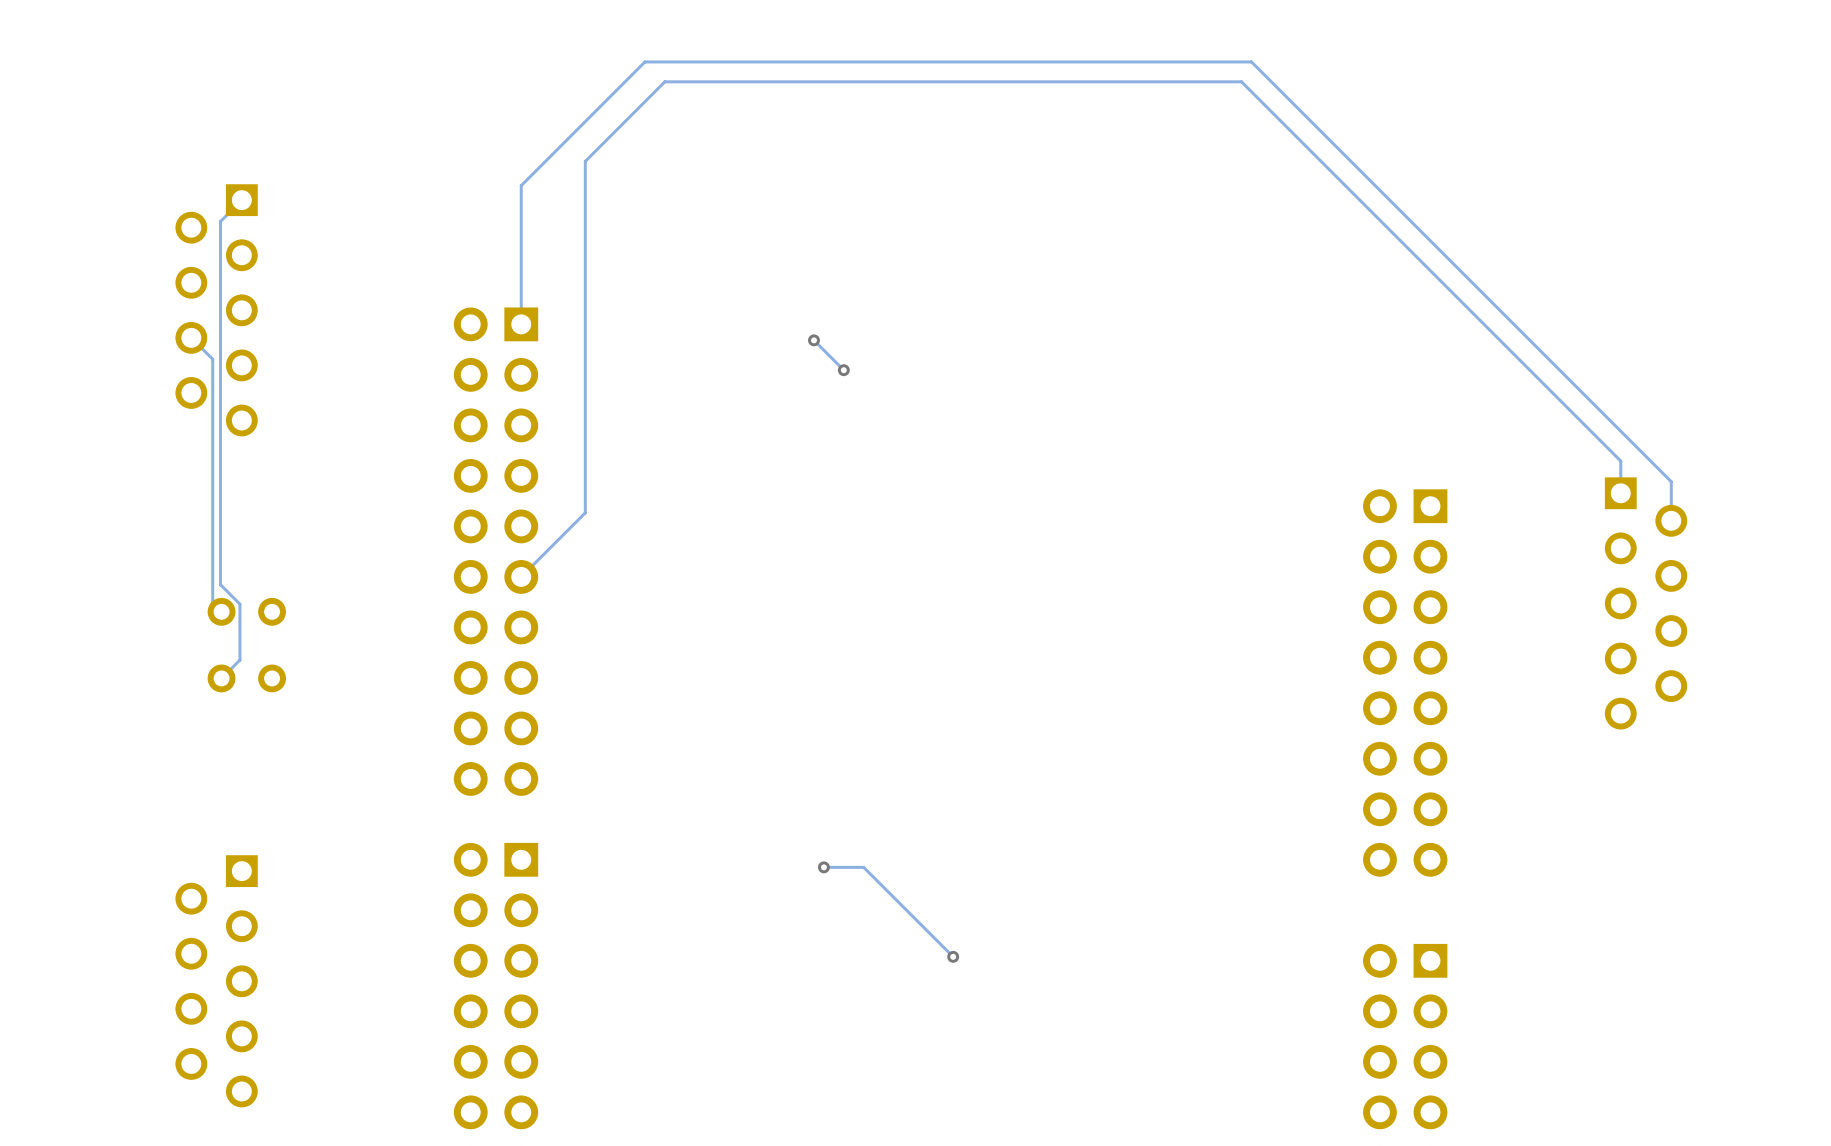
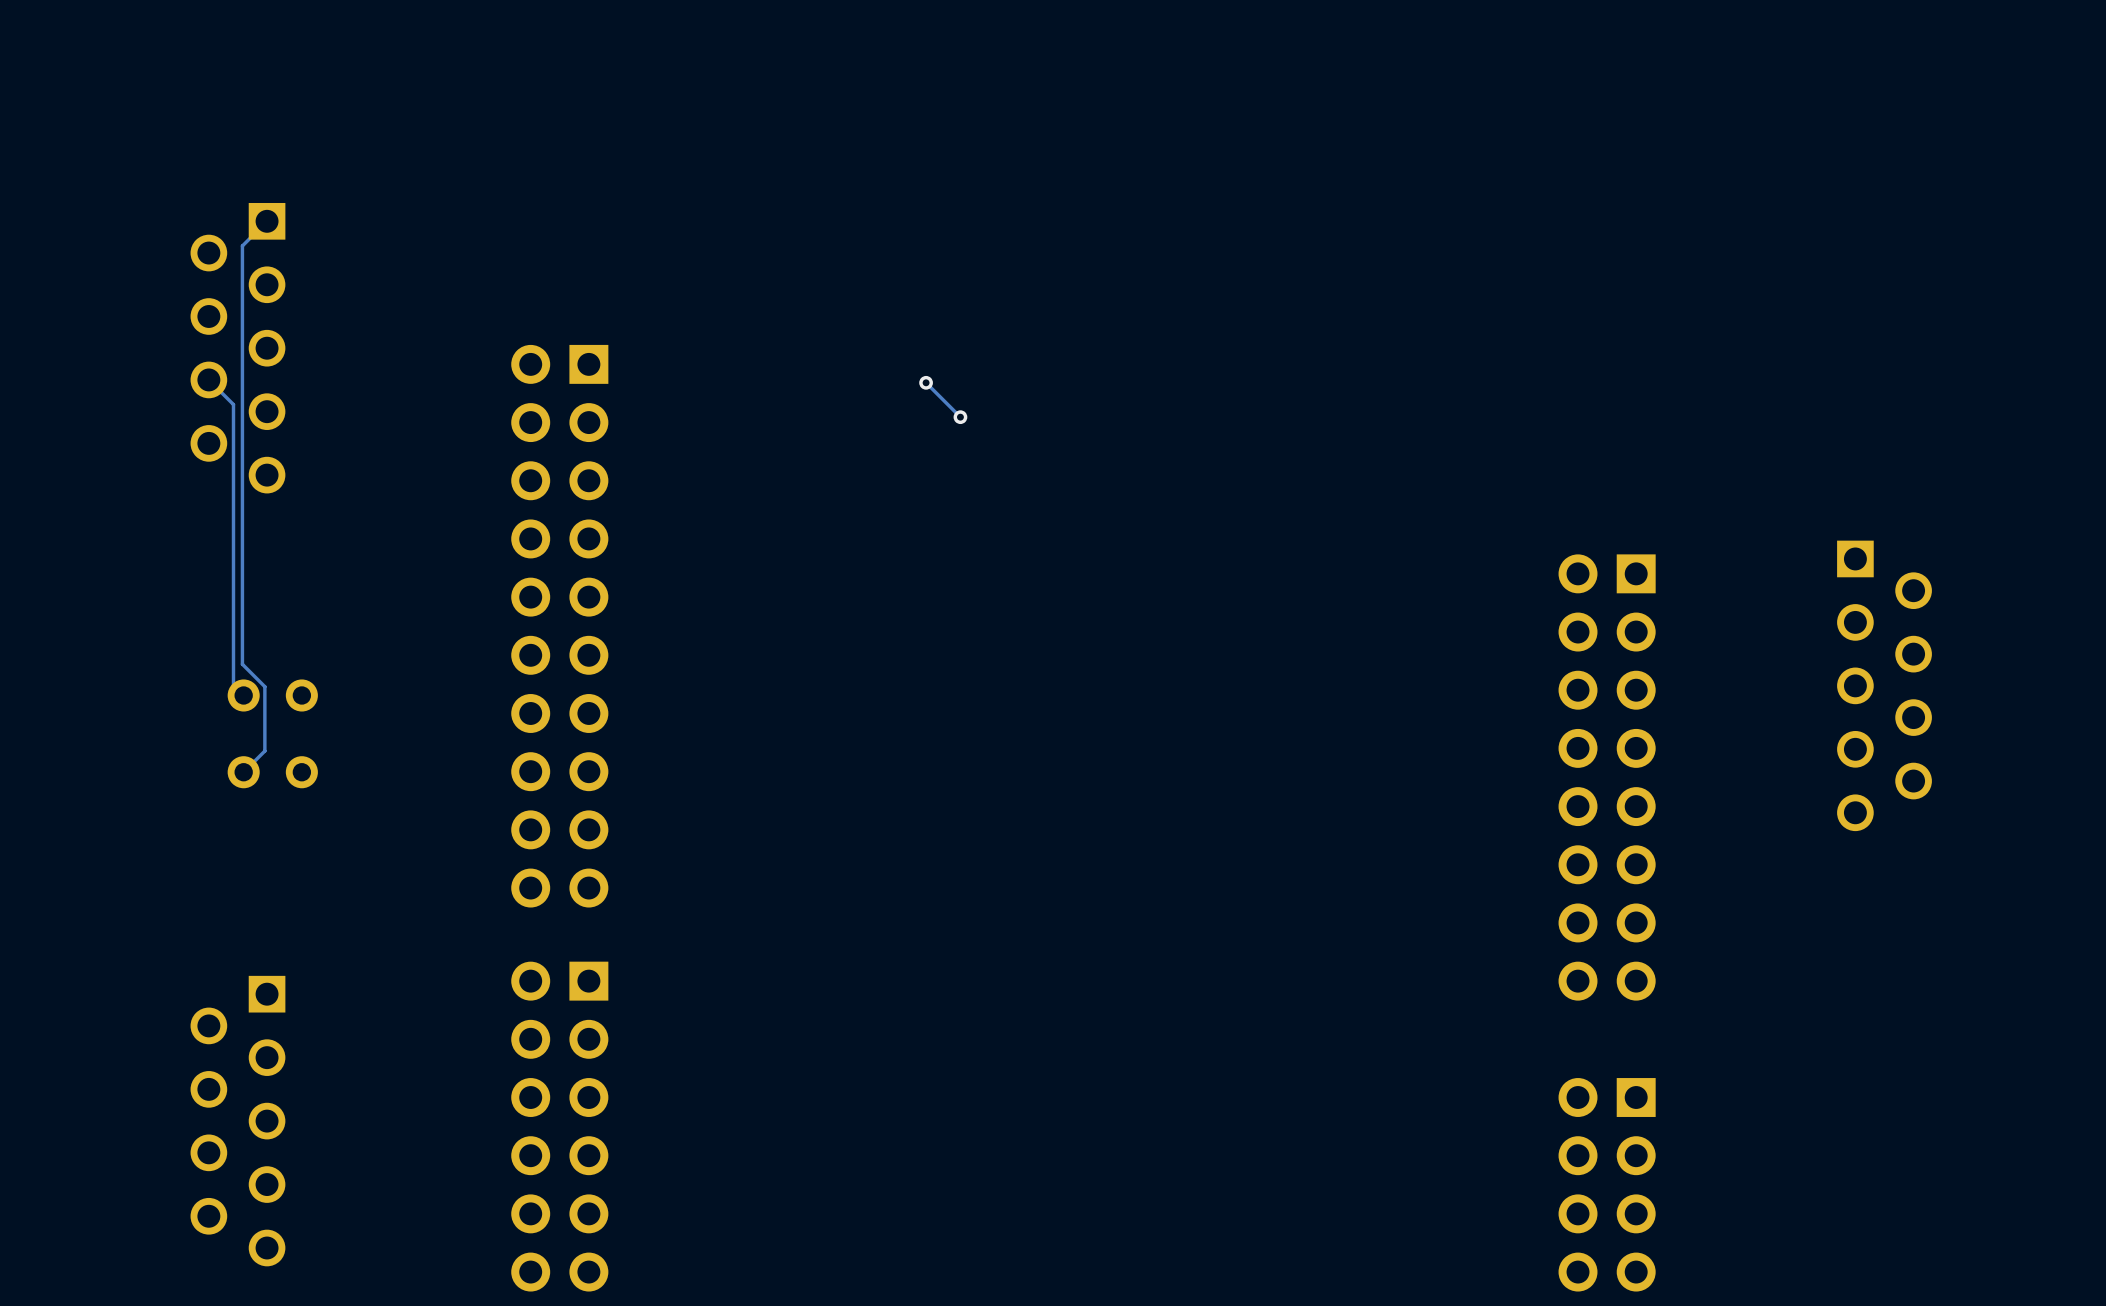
track: (521, 324) (521, 185) (644, 61) (1251, 61) (1671, 481) (1671, 520) -> none
track: (1620, 493) (1620, 461) (1241, 81) (664, 81) (585, 161) (585, 512) (521, 576) -> none
track: (823, 867) (863, 867) (953, 956) -> none
via: (823, 867) -> none
via: (953, 956) -> none

